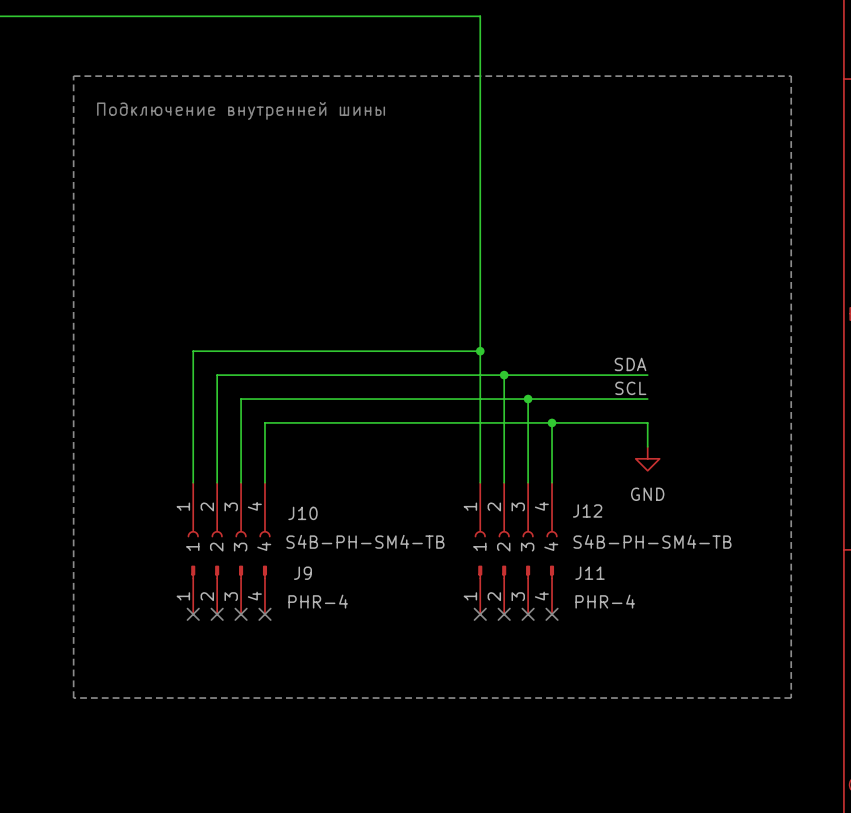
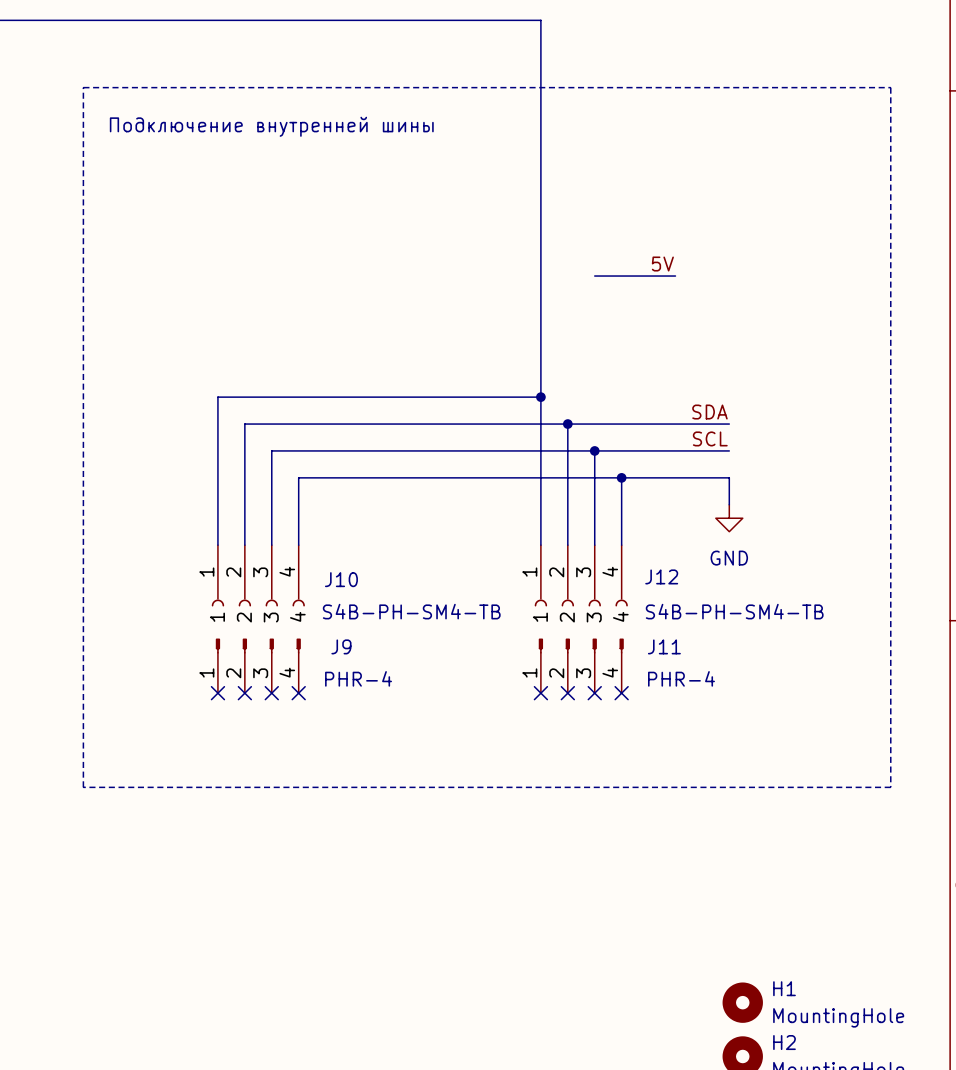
label: none -> 5V (662, 264)
wire: none -> (594, 276) (675, 276)

